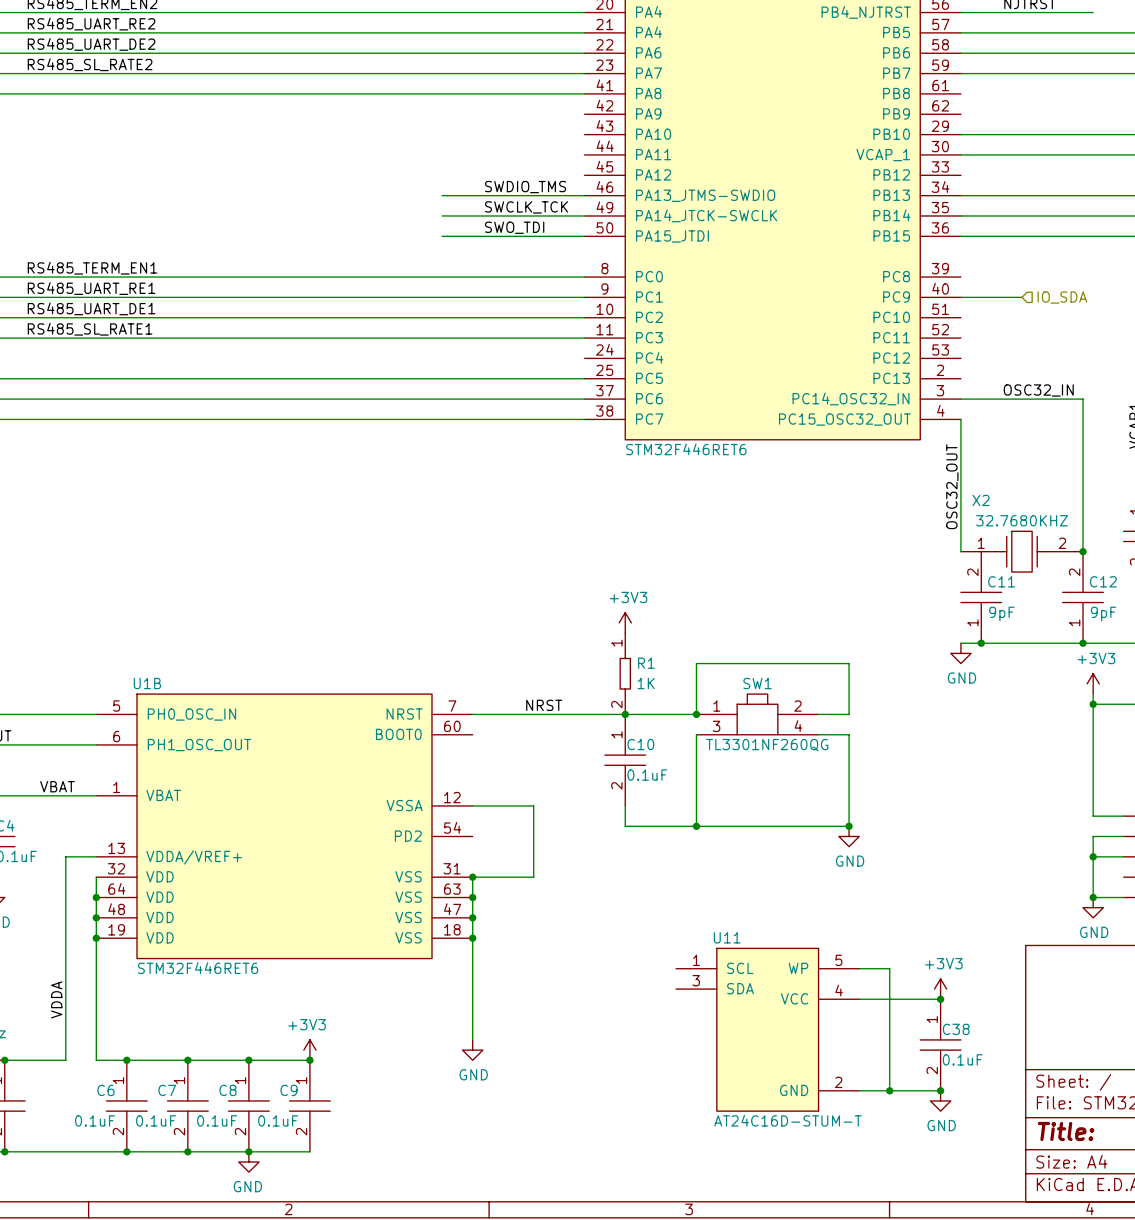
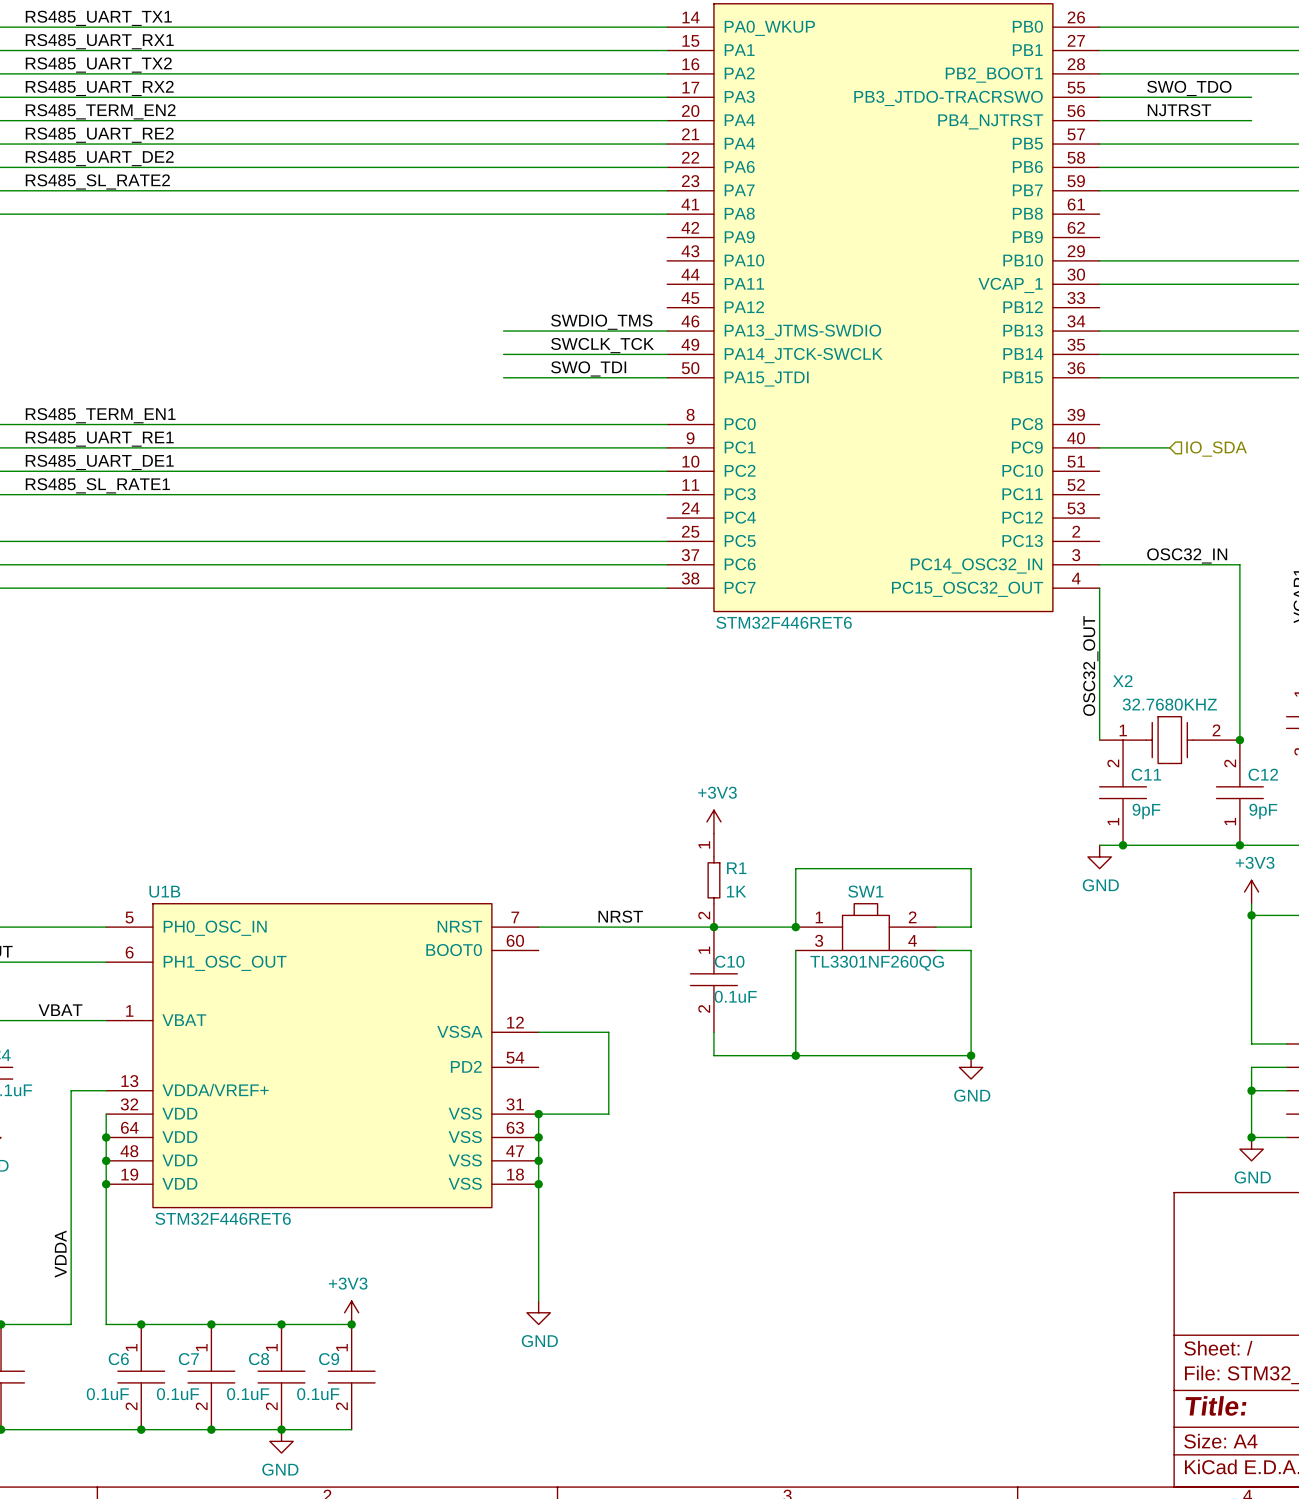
wire: (859, 968) (889, 968) (889, 1090) -> none
power symbol: +3V3 (940, 989) -> none
wire: (859, 999) (940, 999) -> none
junction: (940, 999) -> none
U11: (767, 1029) -> none
C38: (940, 1045) -> none
wire: (859, 1090) (940, 1090) -> none
junction: (889, 1090) -> none
junction: (940, 1090) -> none
power symbol: GND (940, 1100) -> none

